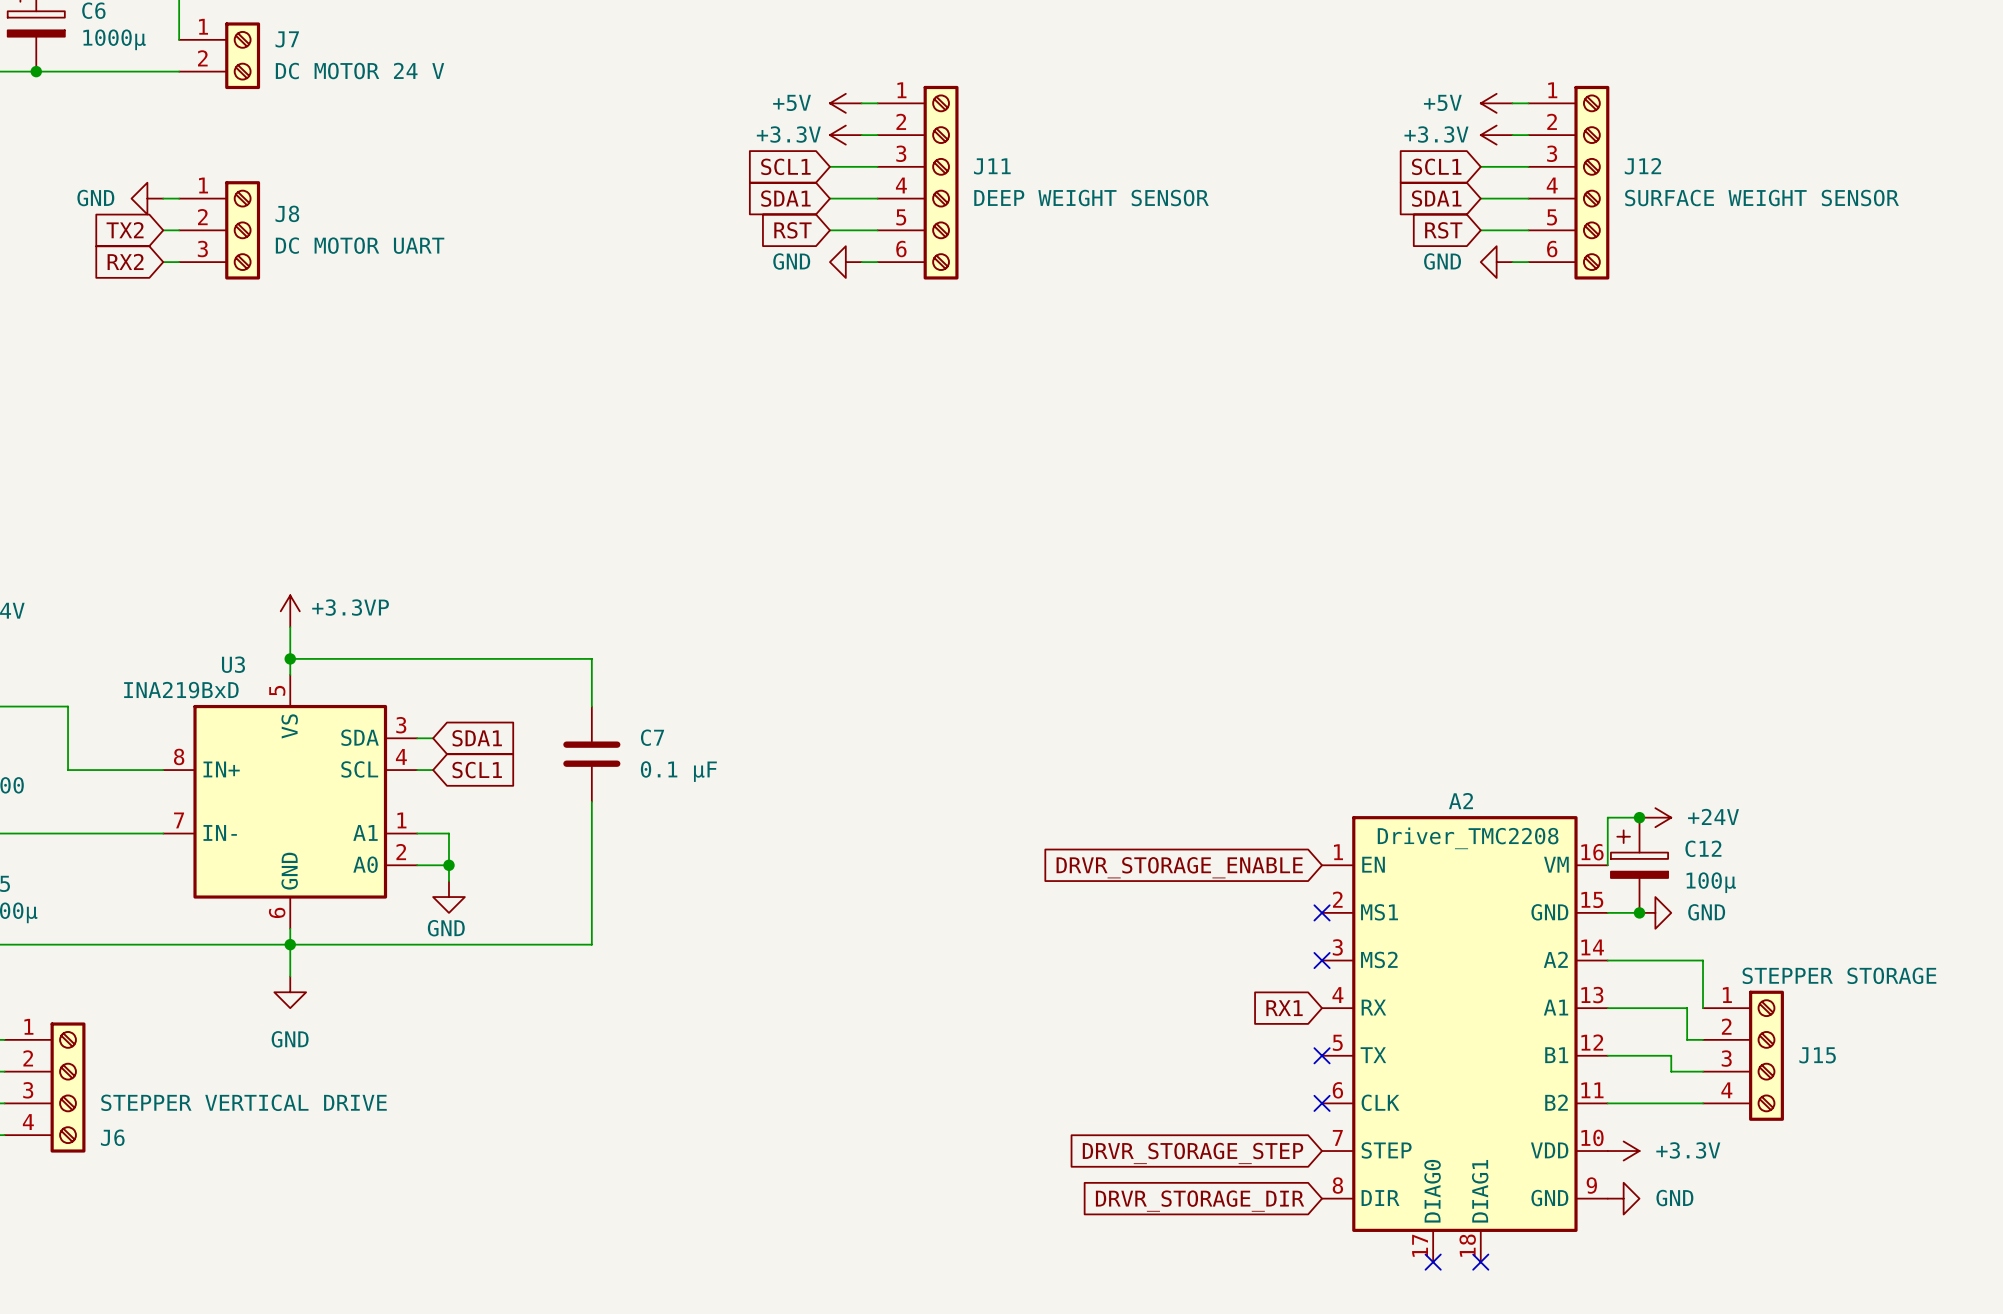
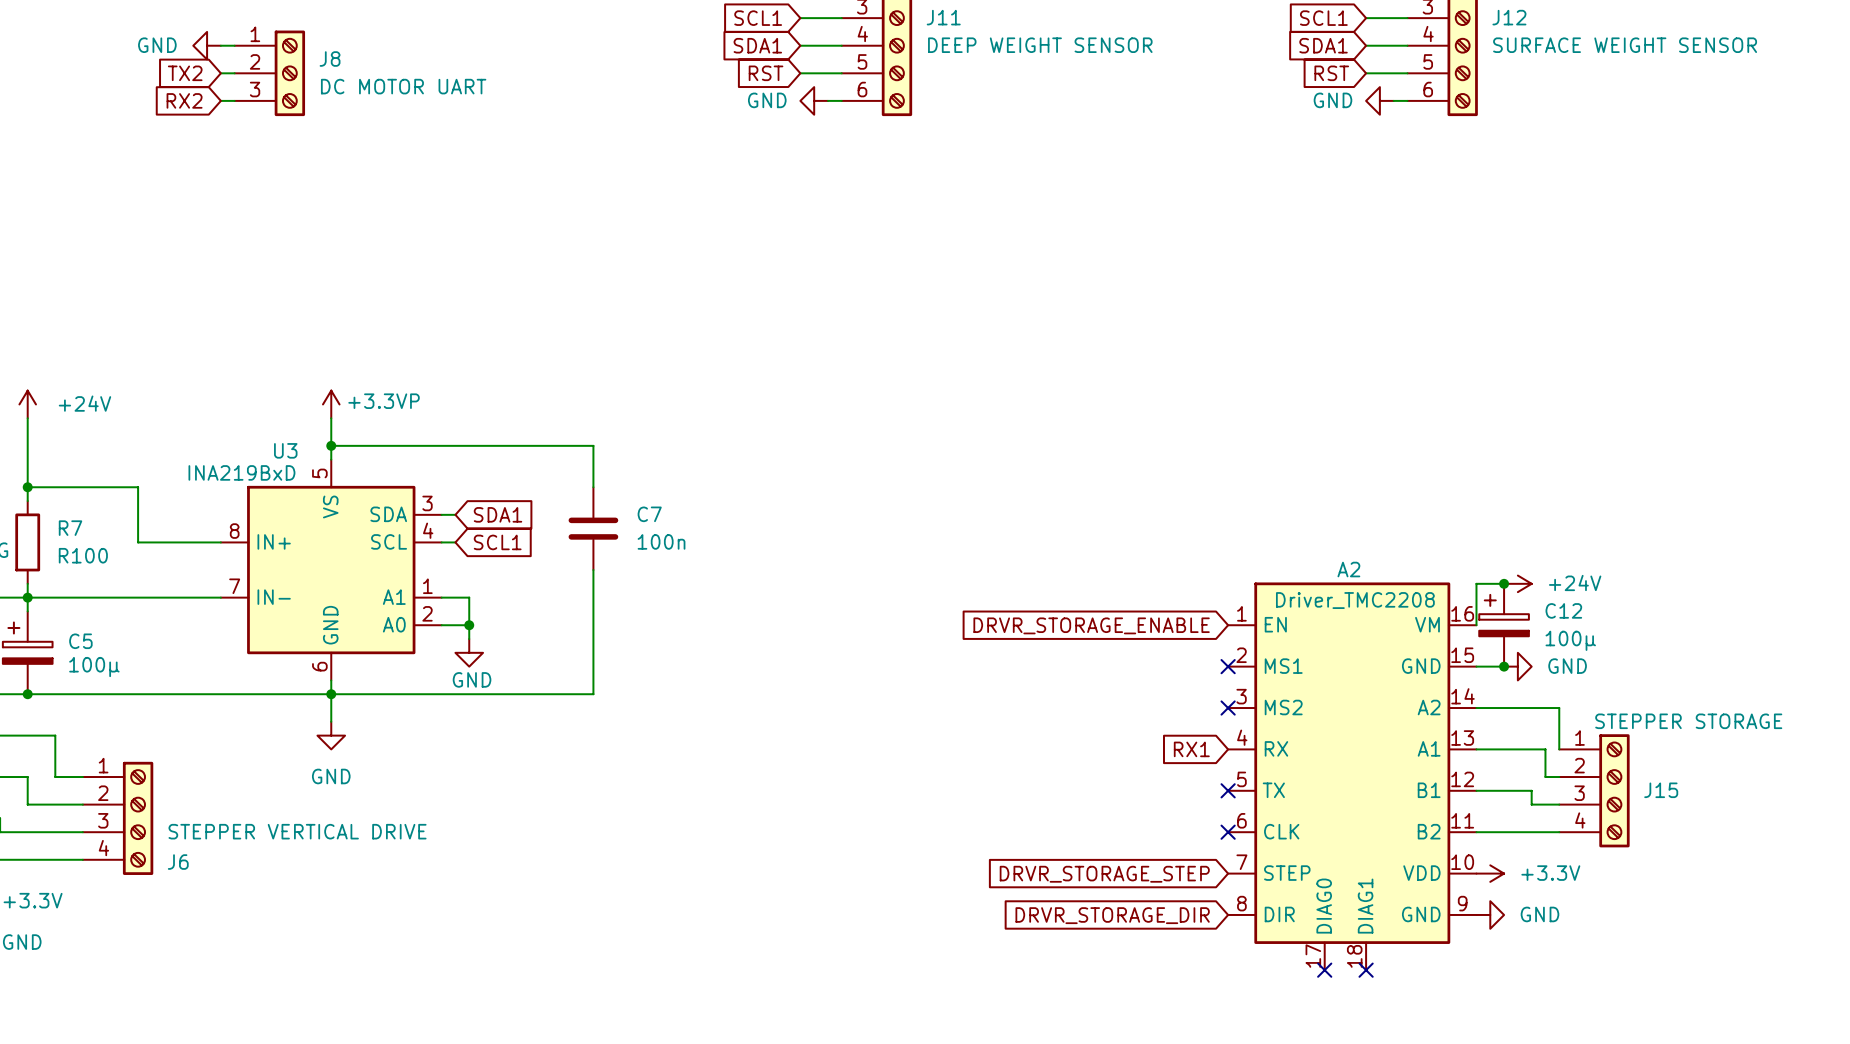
C7 value: 0.1 μF (678, 771) -> 100n (661, 541)

